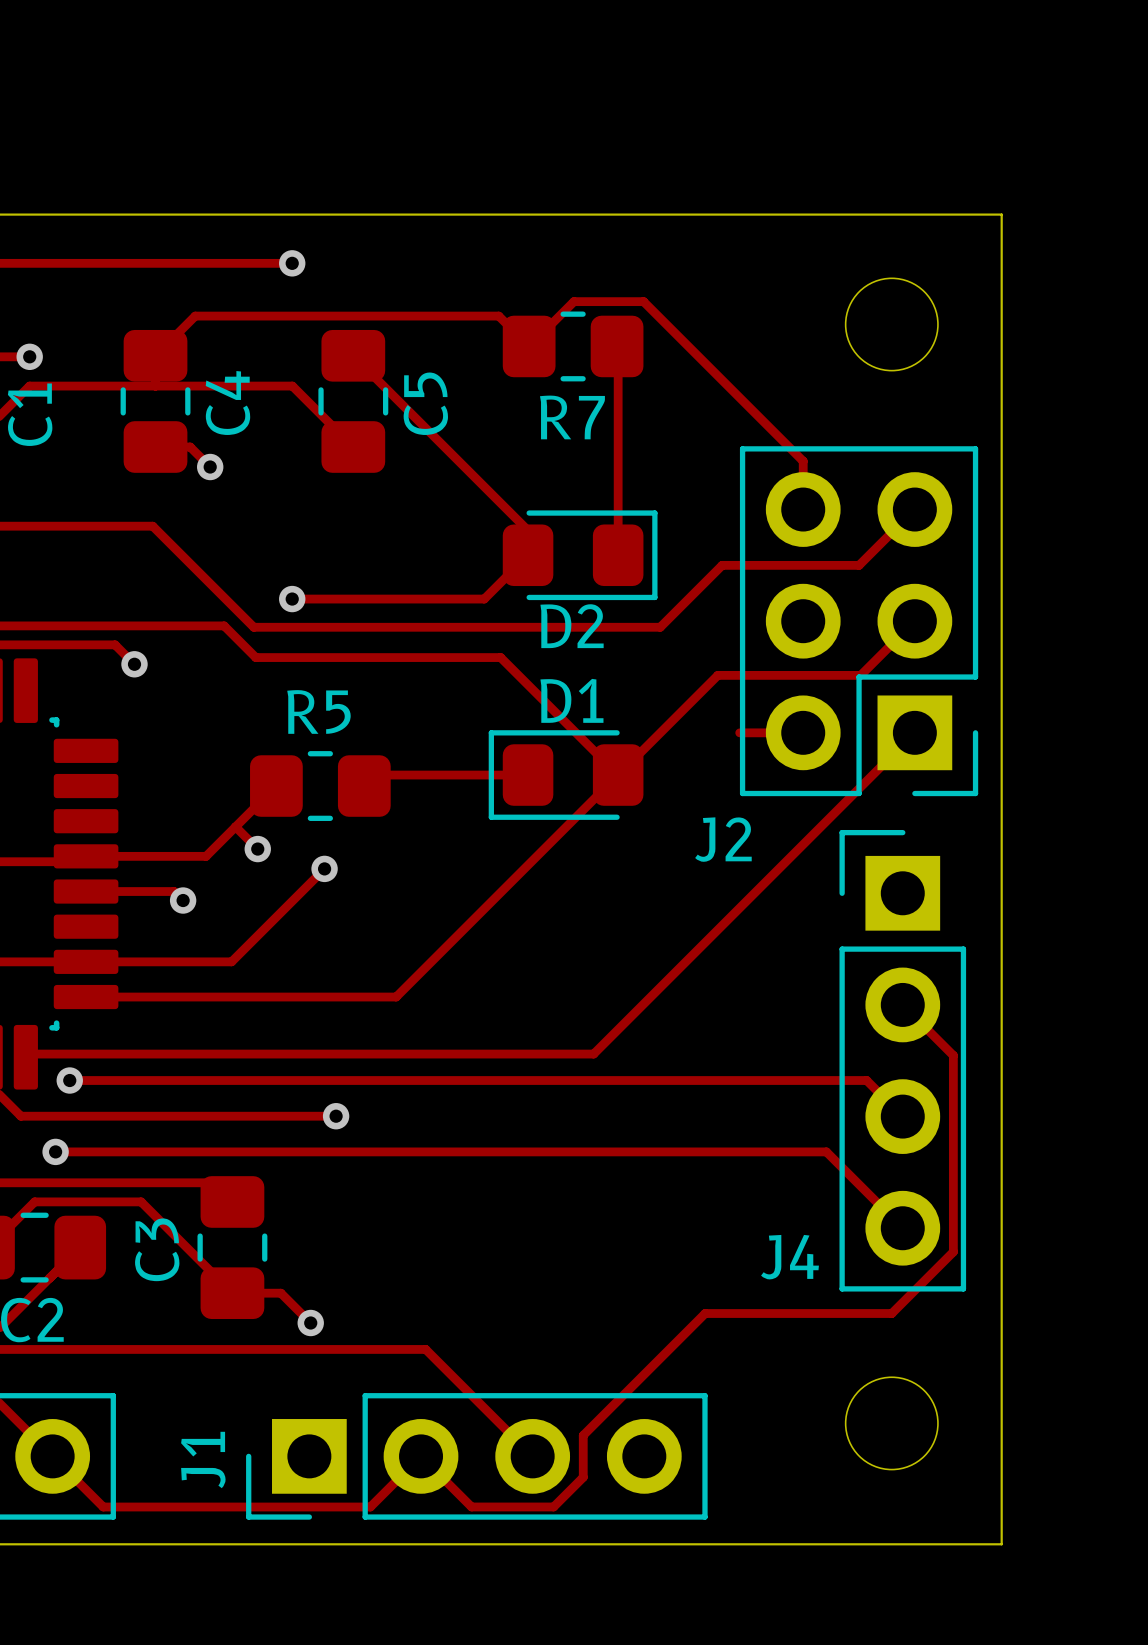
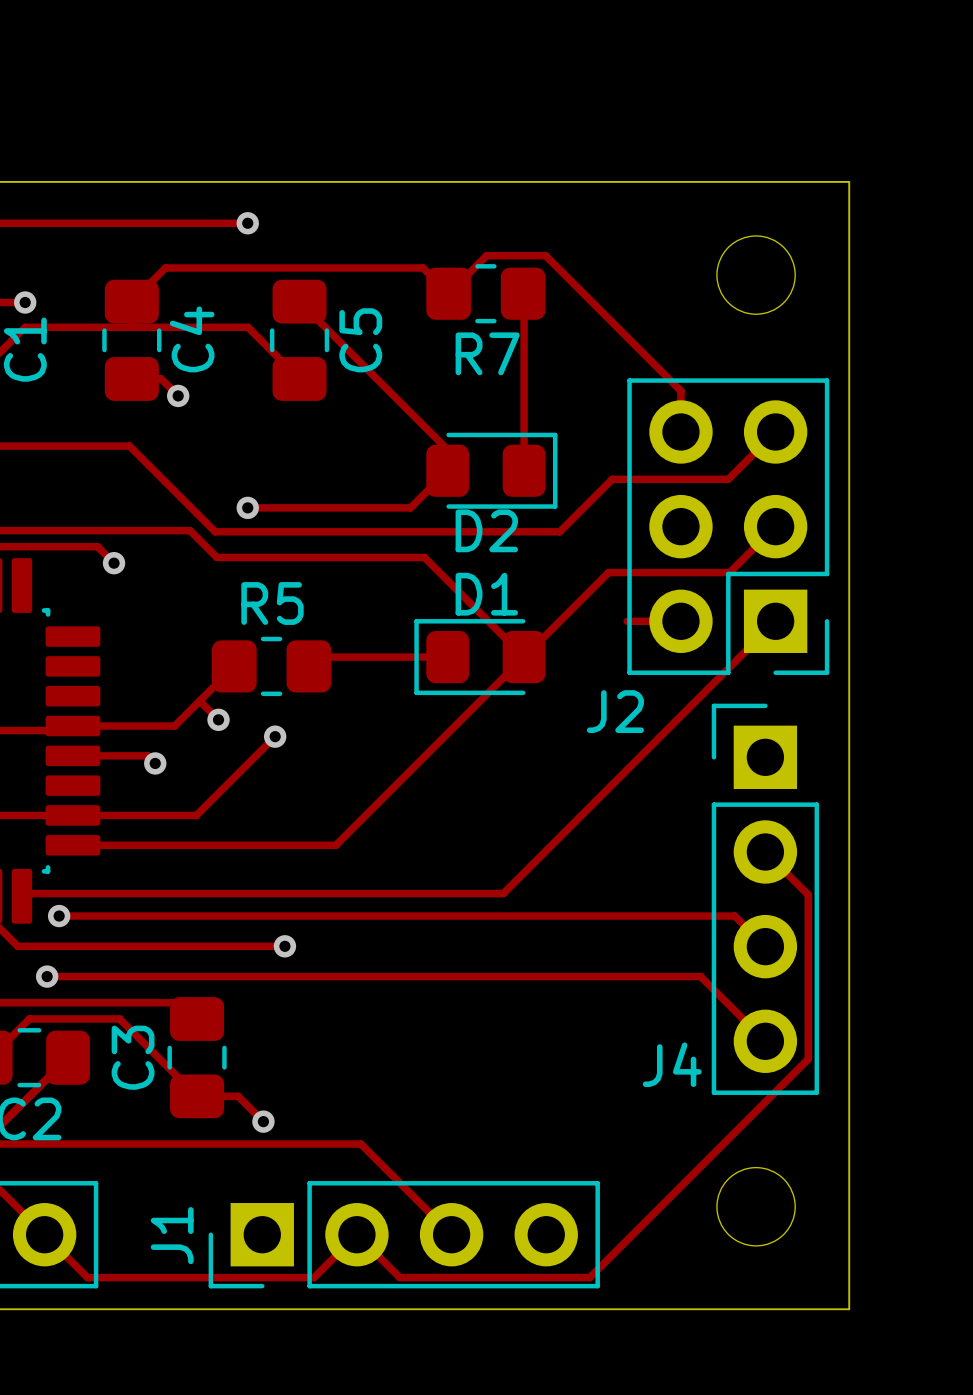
track: (953, 1249) (953, 1251) (891, 1313) (705, 1313) (583, 1435) (583, 1477) (553, 1506) -> (808, 1059) (589, 1277) (469, 1277)

